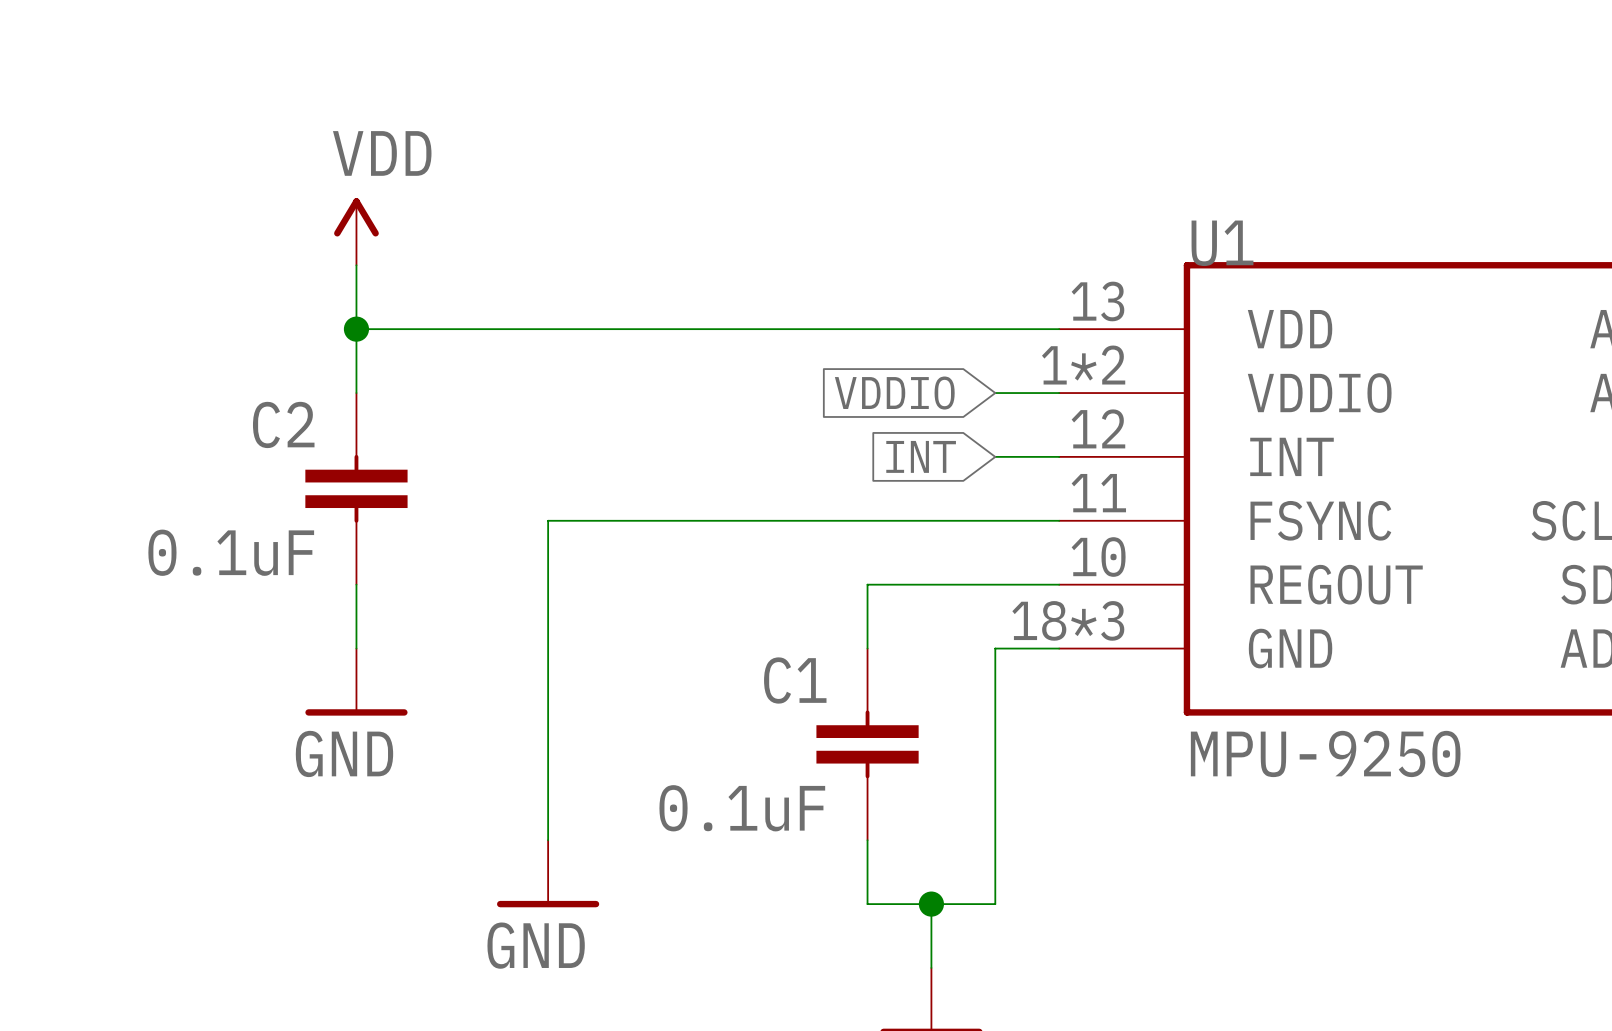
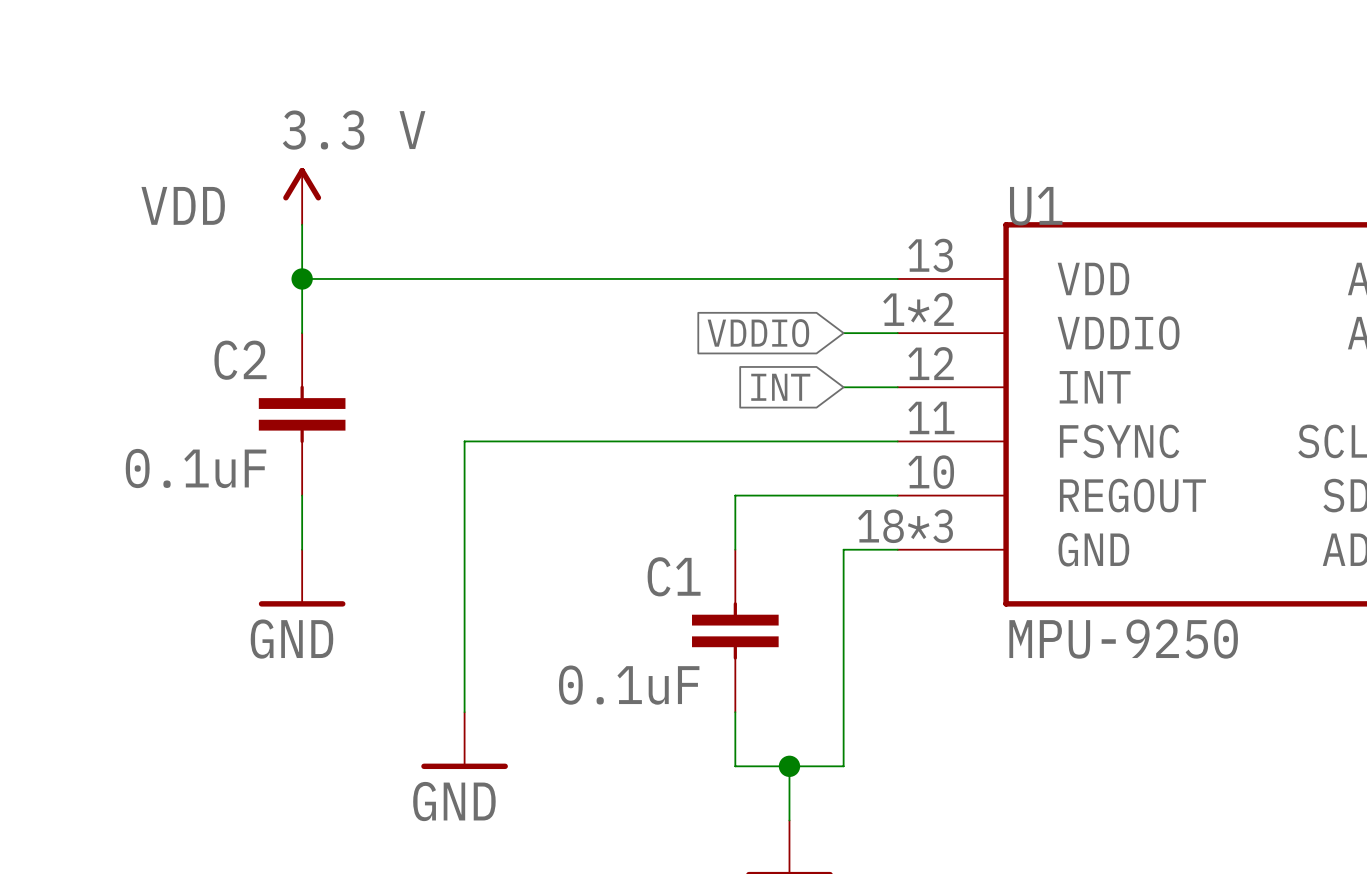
power symbol: VDD (356, 231) -> 3.3 V (302, 196)
text: none -> VDD (183, 205)

